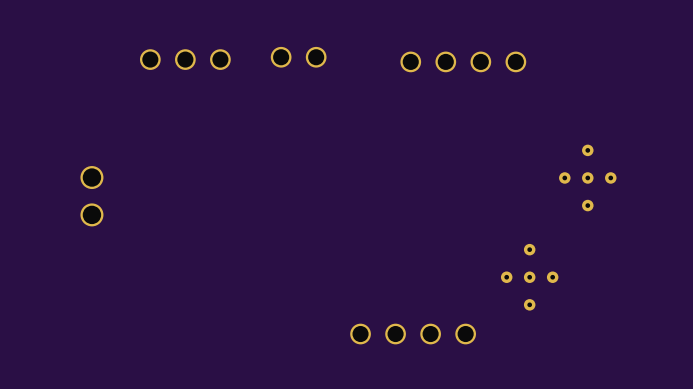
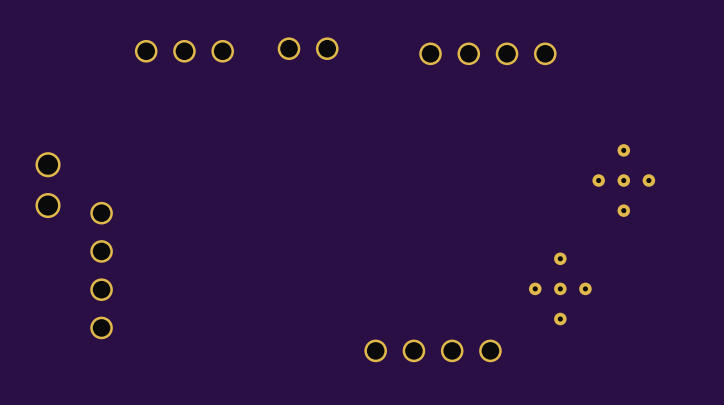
part: none -> (48, 164)
part: (91, 177) -> none
part: none -> (48, 205)
part: none -> (101, 213)
part: (91, 214) -> none
part: none -> (101, 251)
part: none -> (101, 289)
part: none -> (101, 327)

